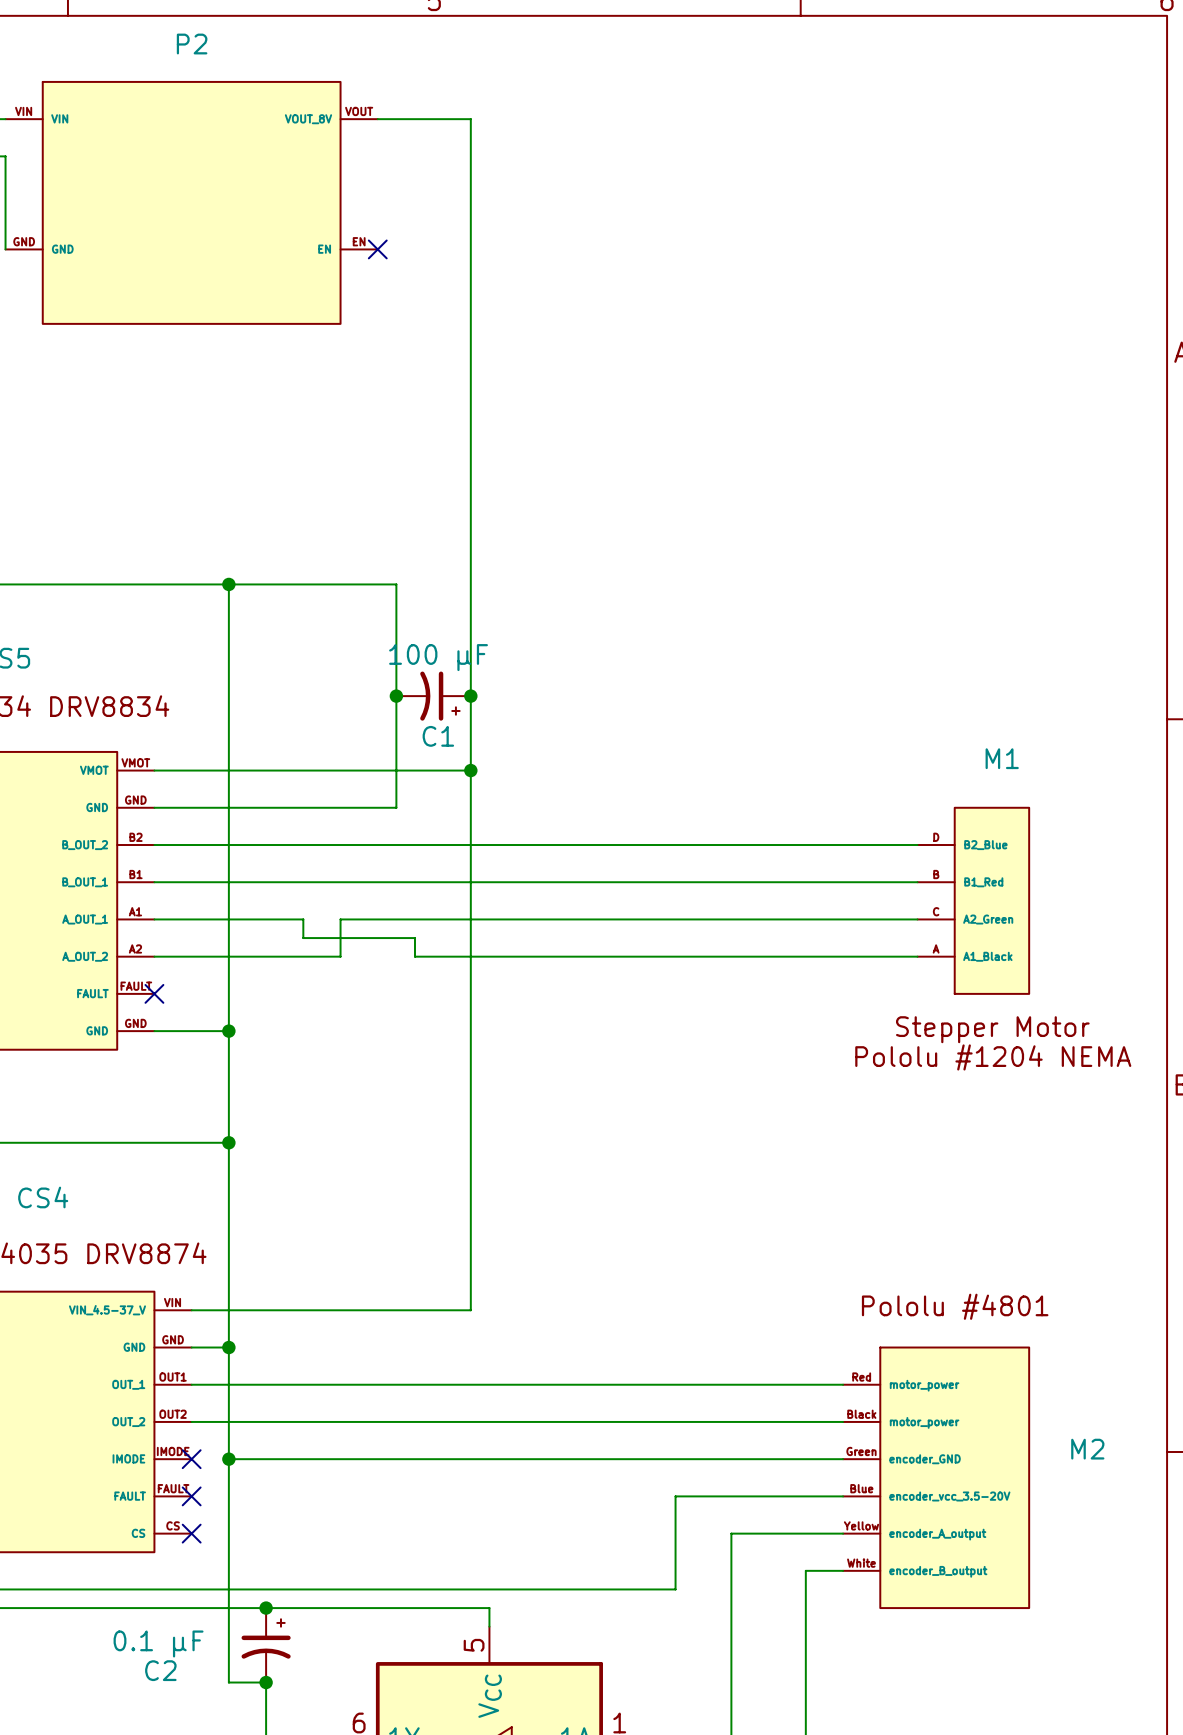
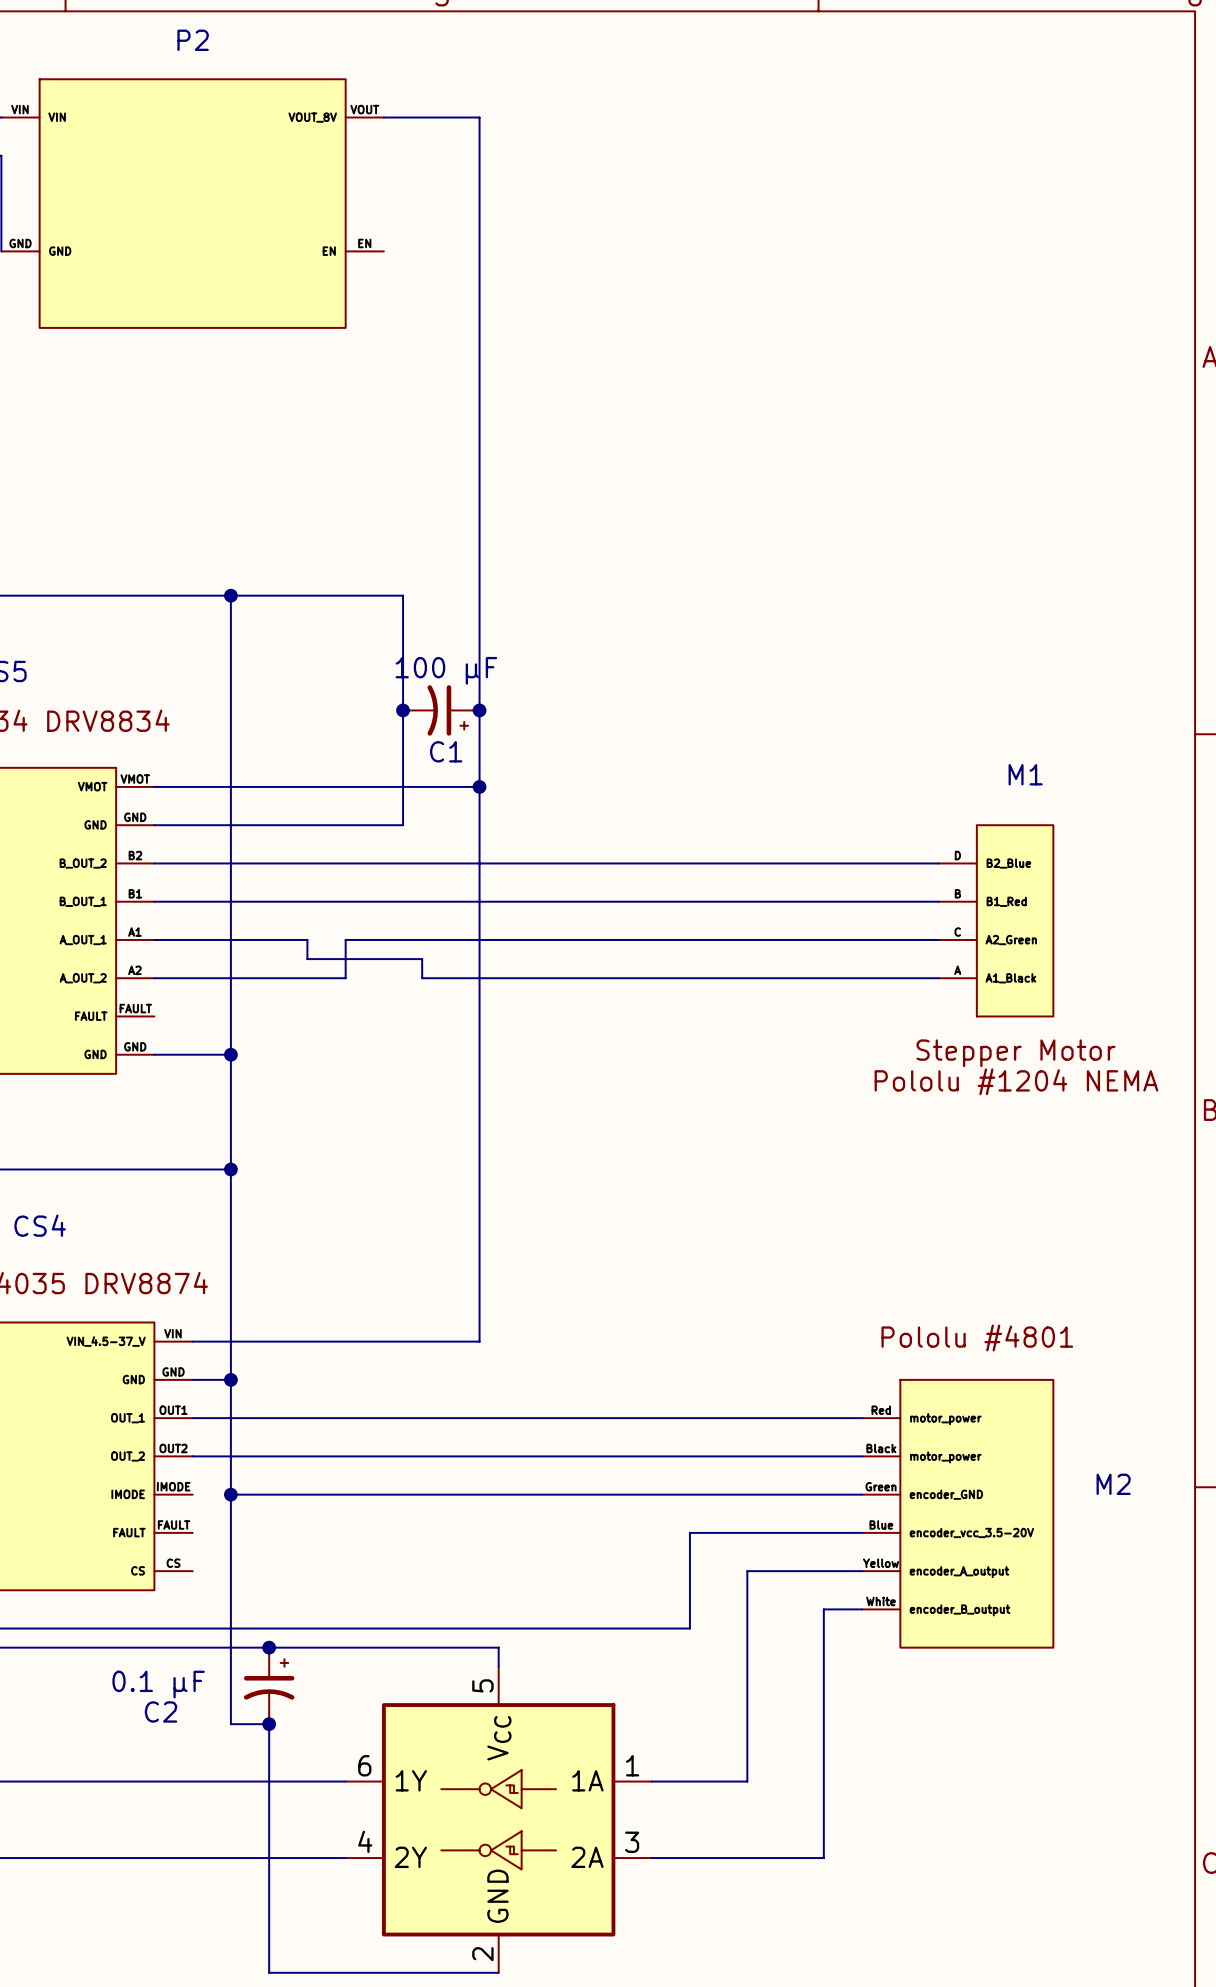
no-connect mark: (377, 249) -> none
no-connect mark: (154, 993) -> none
no-connect mark: (191, 1459) -> none
no-connect mark: (191, 1496) -> none
no-connect mark: (191, 1533) -> none

